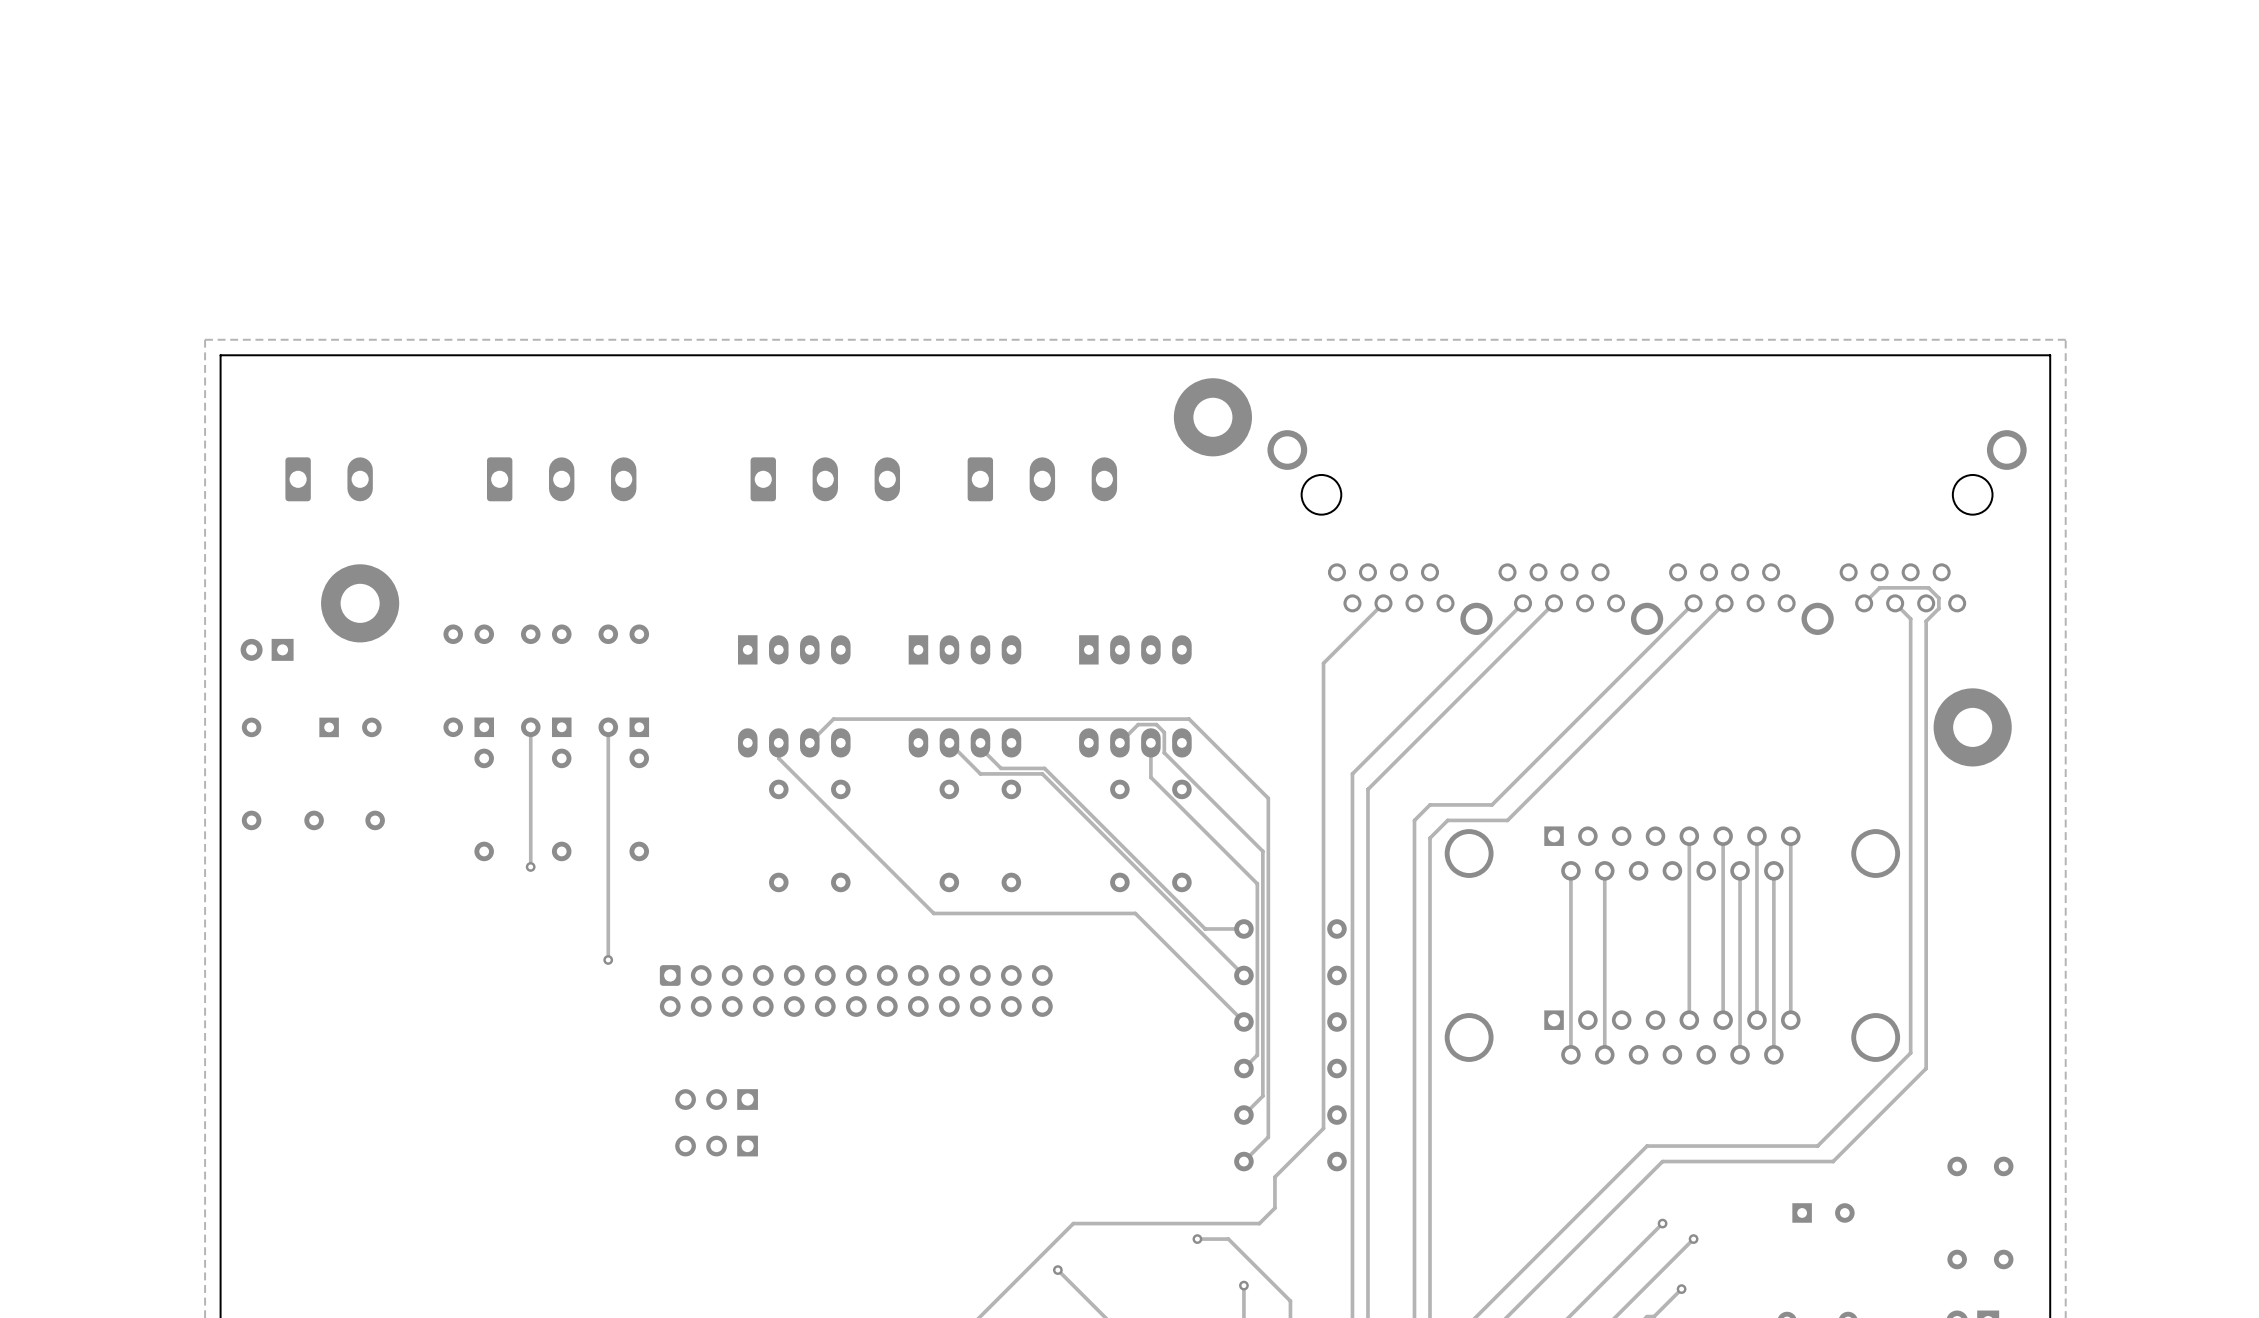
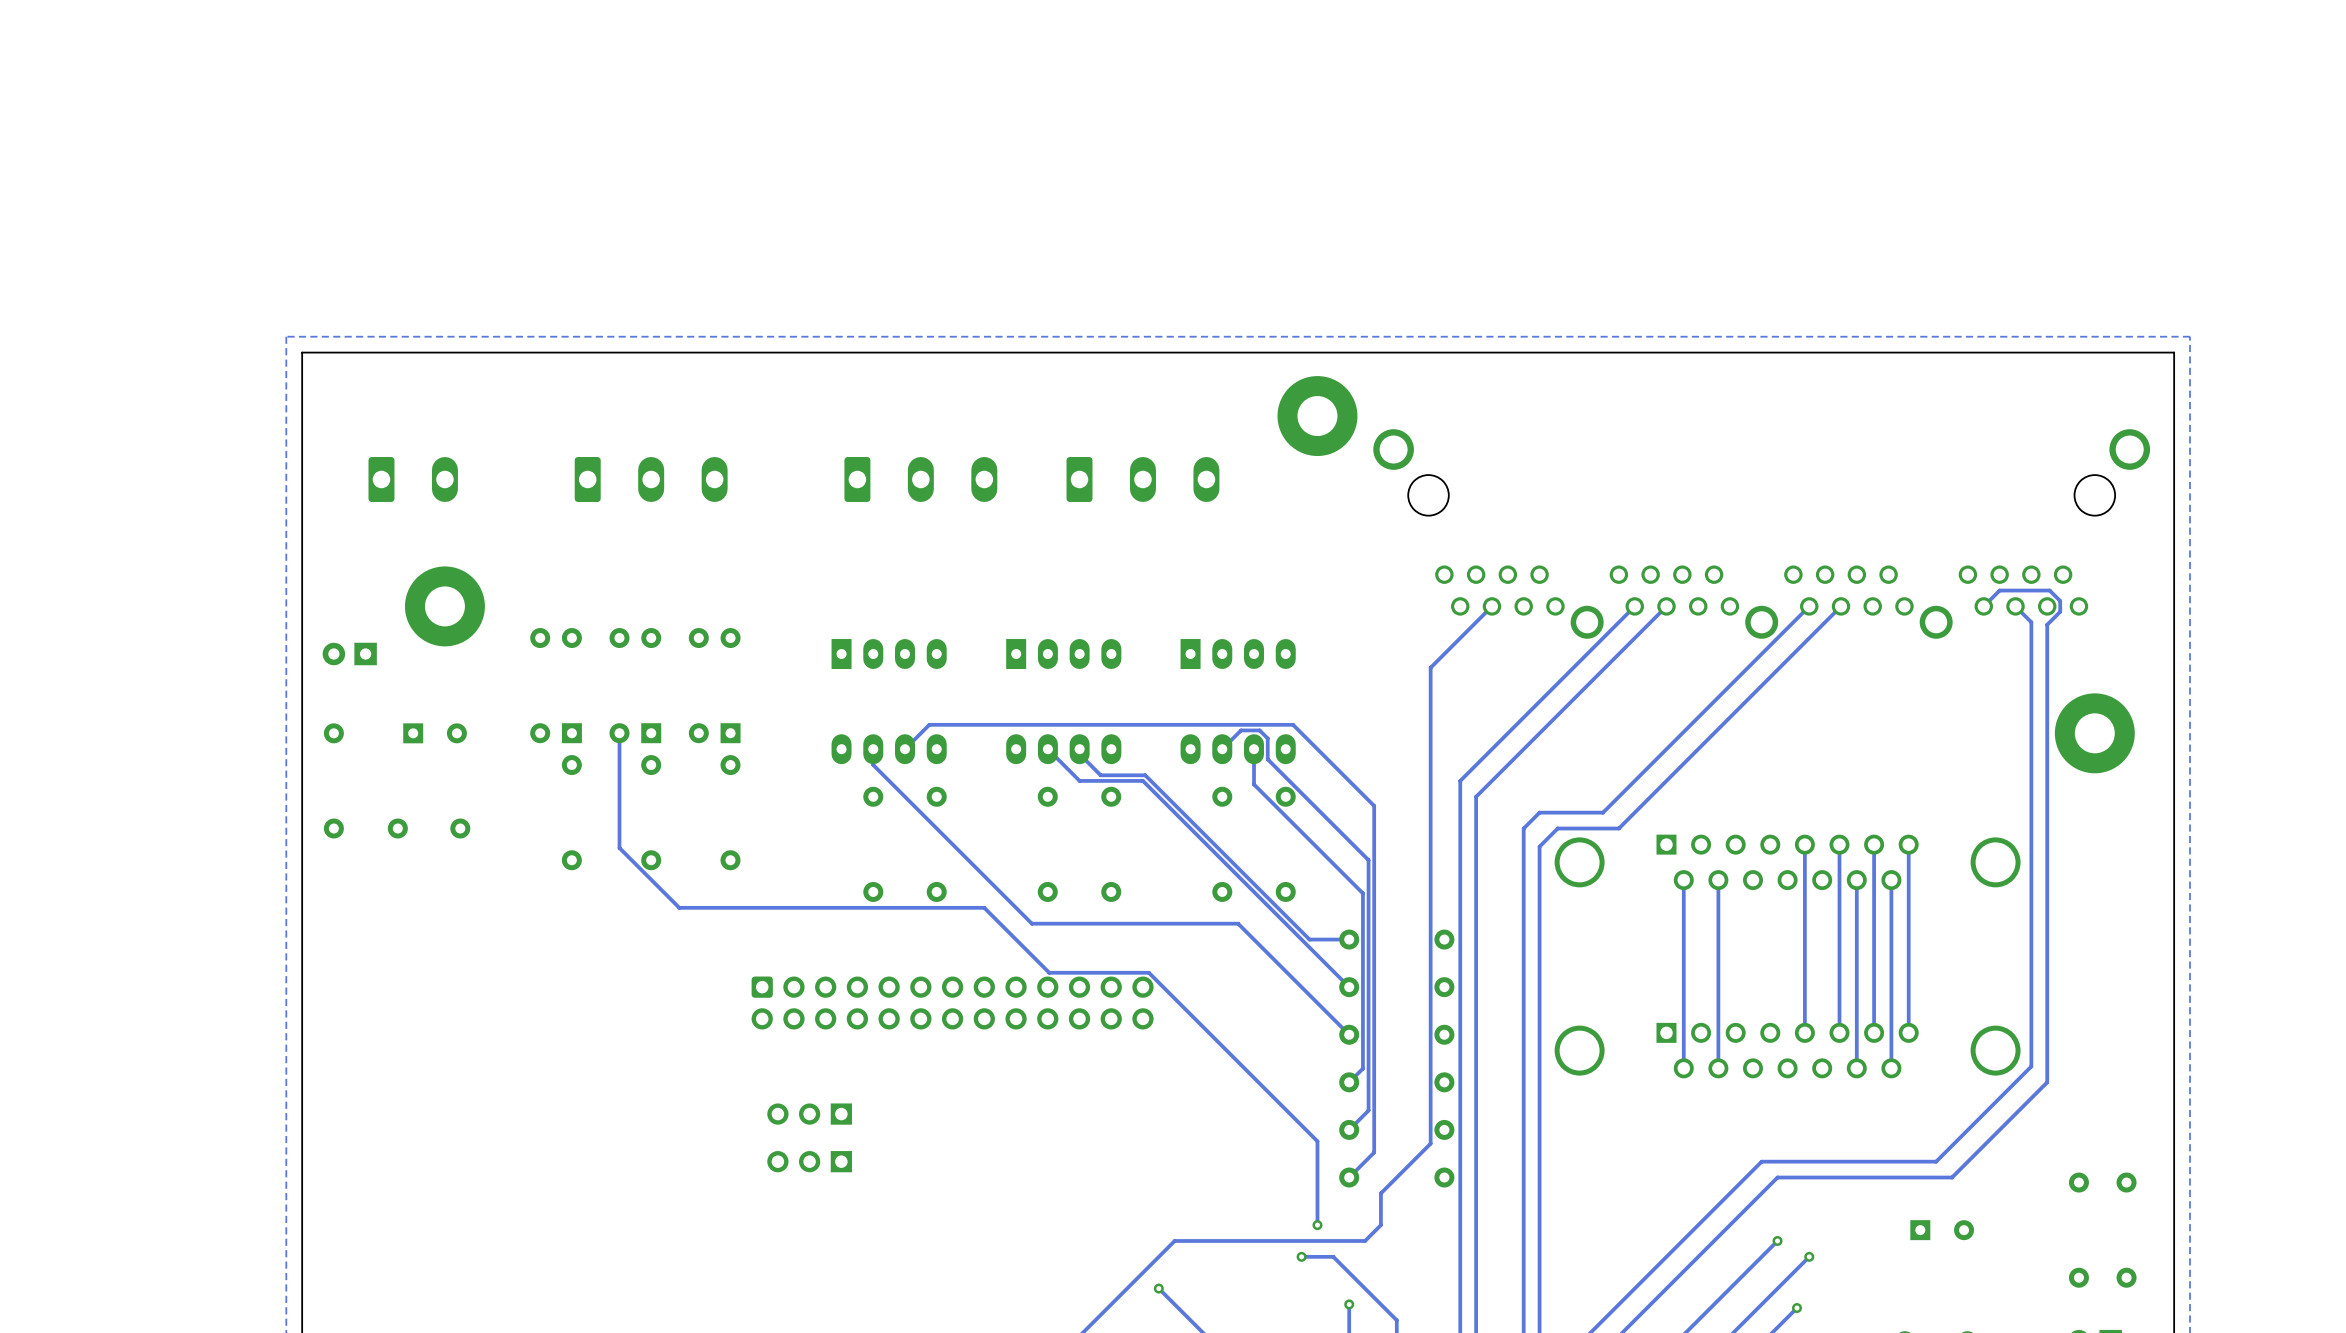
track: (608, 727) (608, 959) -> none
track: (530, 839) (530, 867) -> (619, 848) (679, 907) (984, 907) (1049, 972) (1148, 972) (1317, 1141) (1317, 1225)
via: (530, 866) -> none
via: (608, 959) -> none
via: none -> (1317, 1225)

